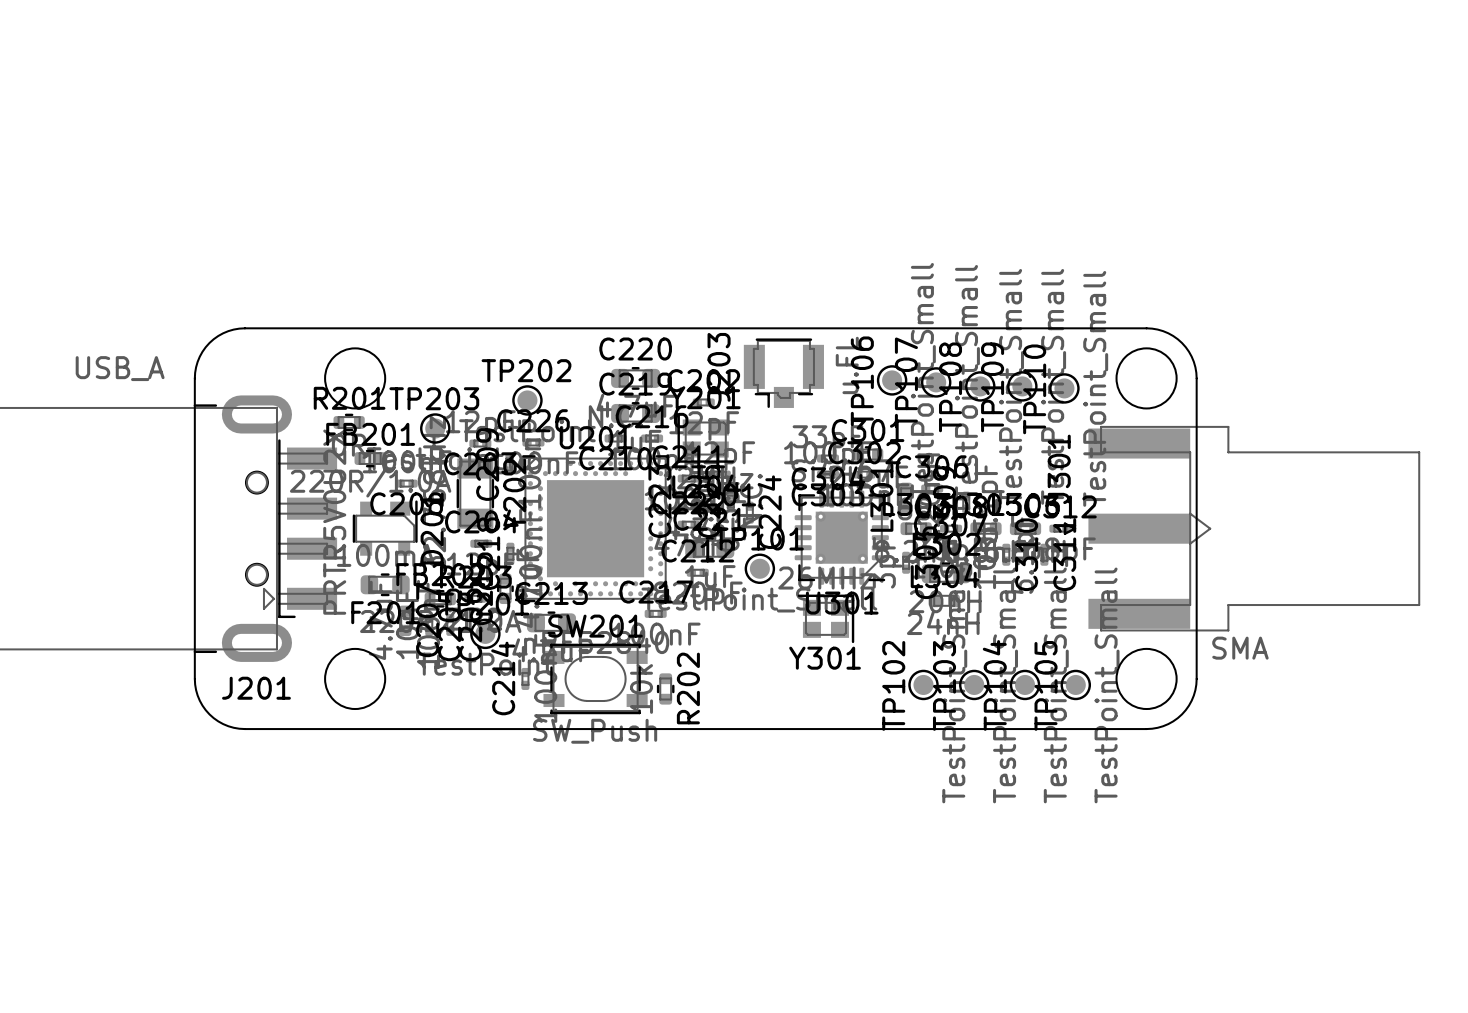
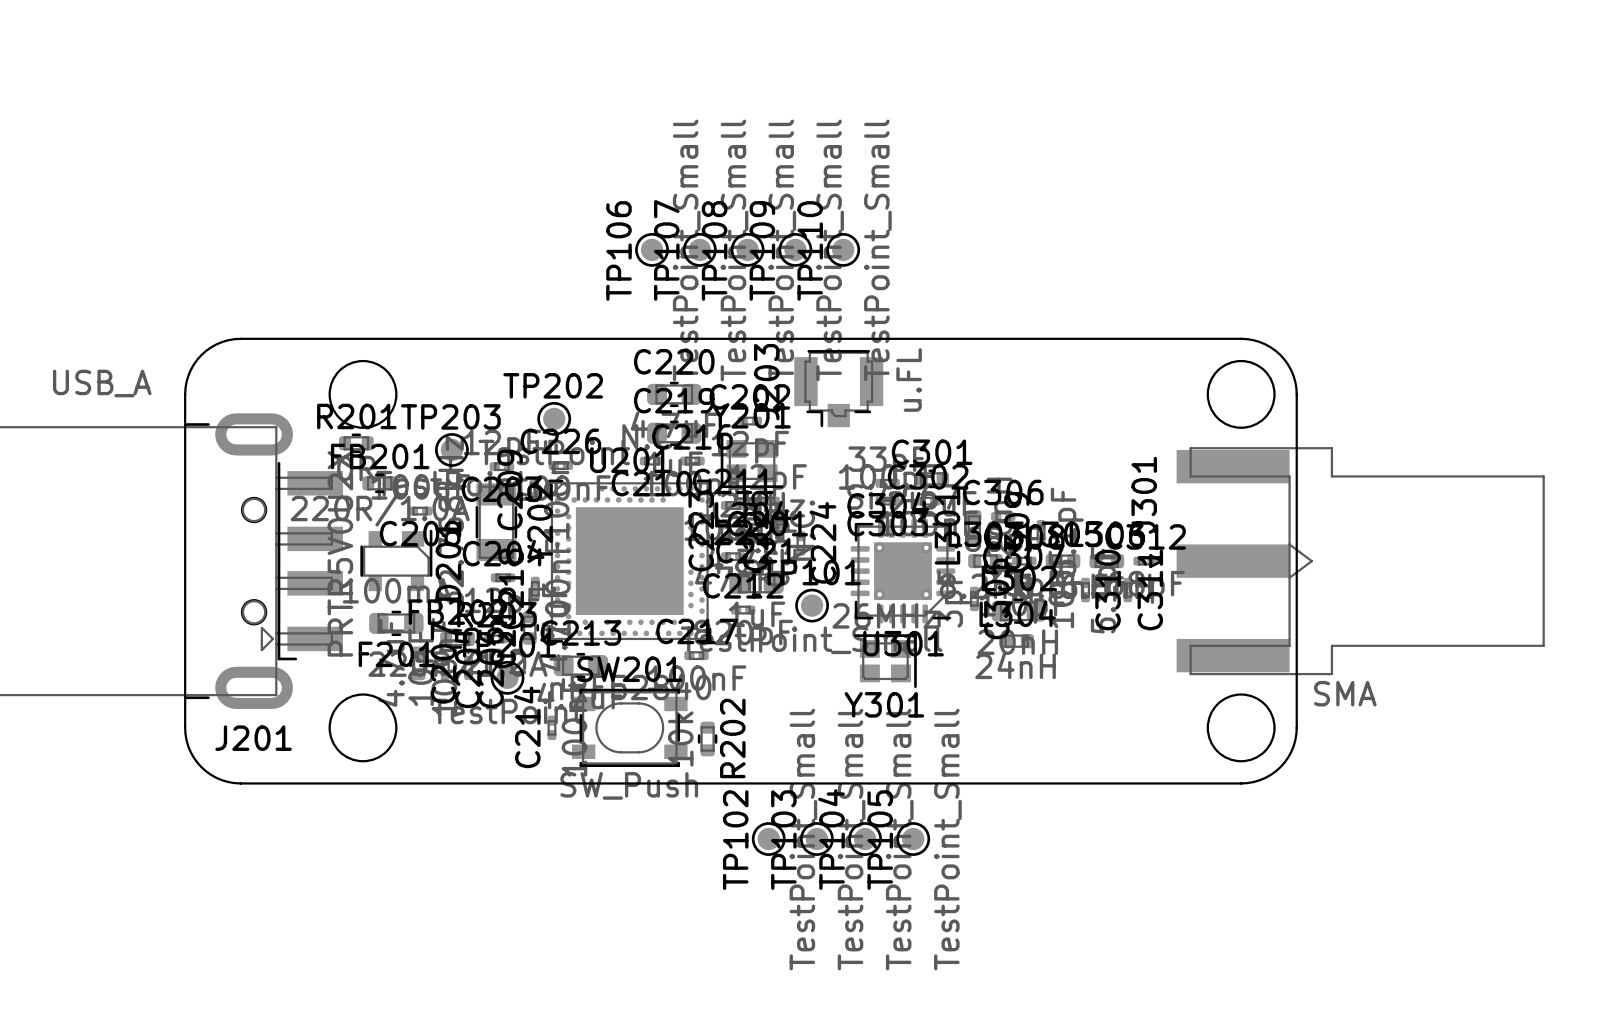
TP106 position: (892, 380) -> (652, 249)
TP107 position: (936, 382) -> (699, 249)
TP108 position: (980, 386) -> (747, 249)
TP109 position: (1022, 386) -> (795, 249)
TP110 position: (1064, 388) -> (843, 249)
TP102 position: (923, 684) -> (768, 839)
TP103 position: (974, 684) -> (816, 839)
TP104 position: (1025, 684) -> (865, 839)
TP105 position: (1075, 684) -> (913, 839)

